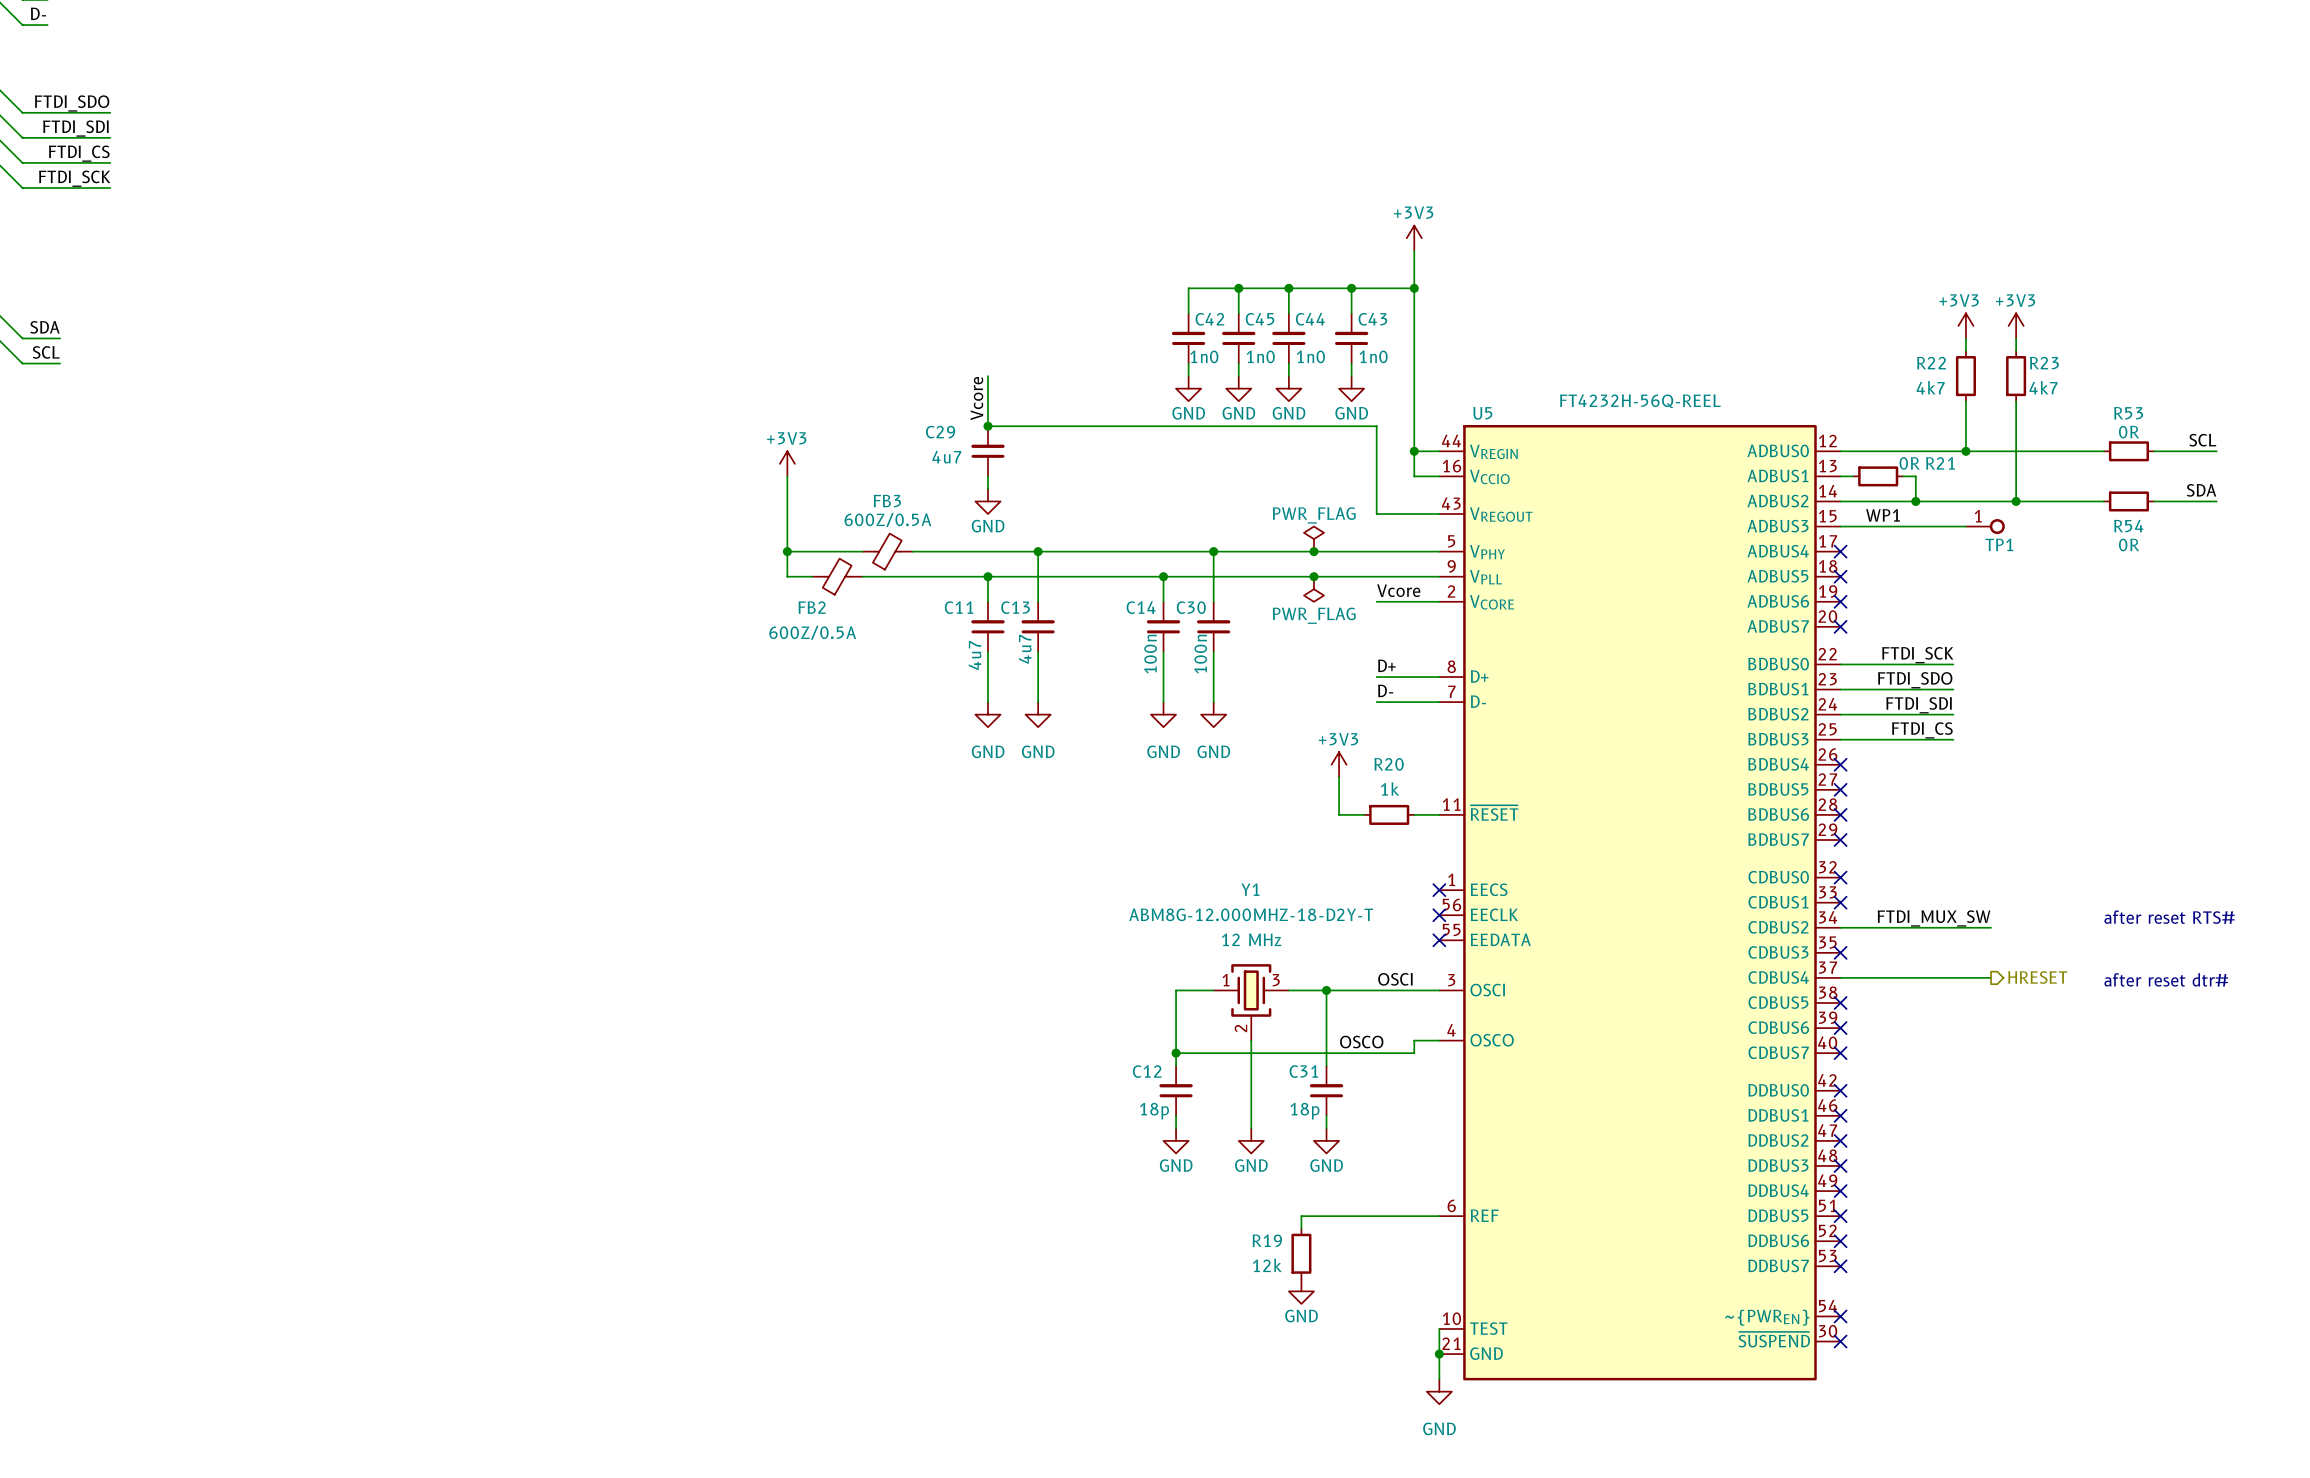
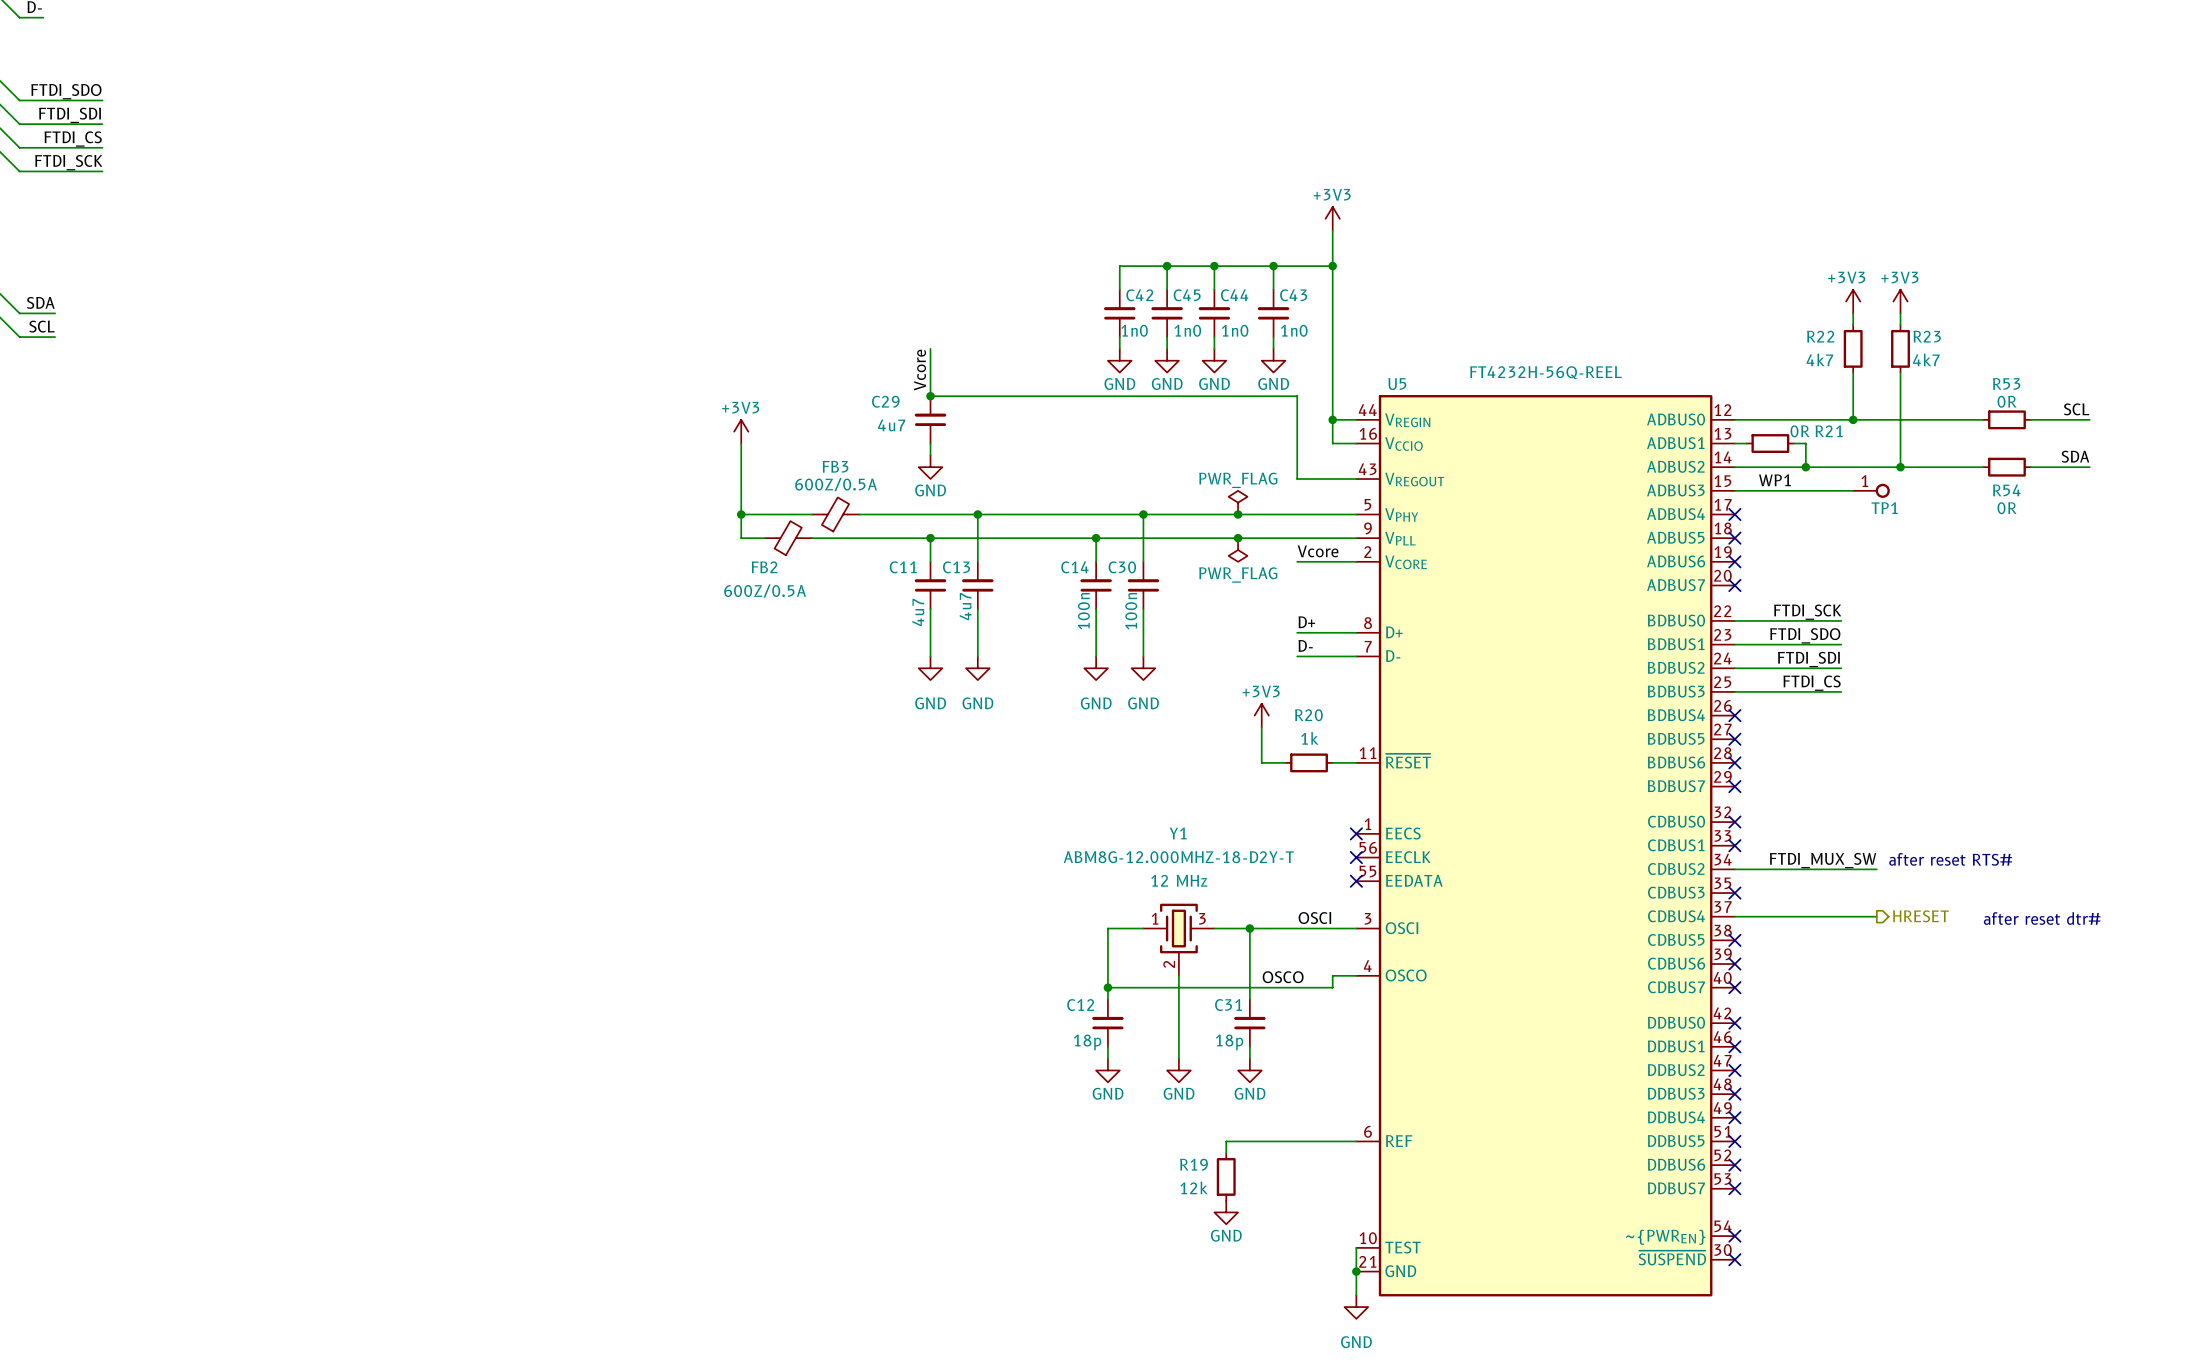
text position: after reset RTS# (2169, 917) -> after reset RTS# (1950, 859)

